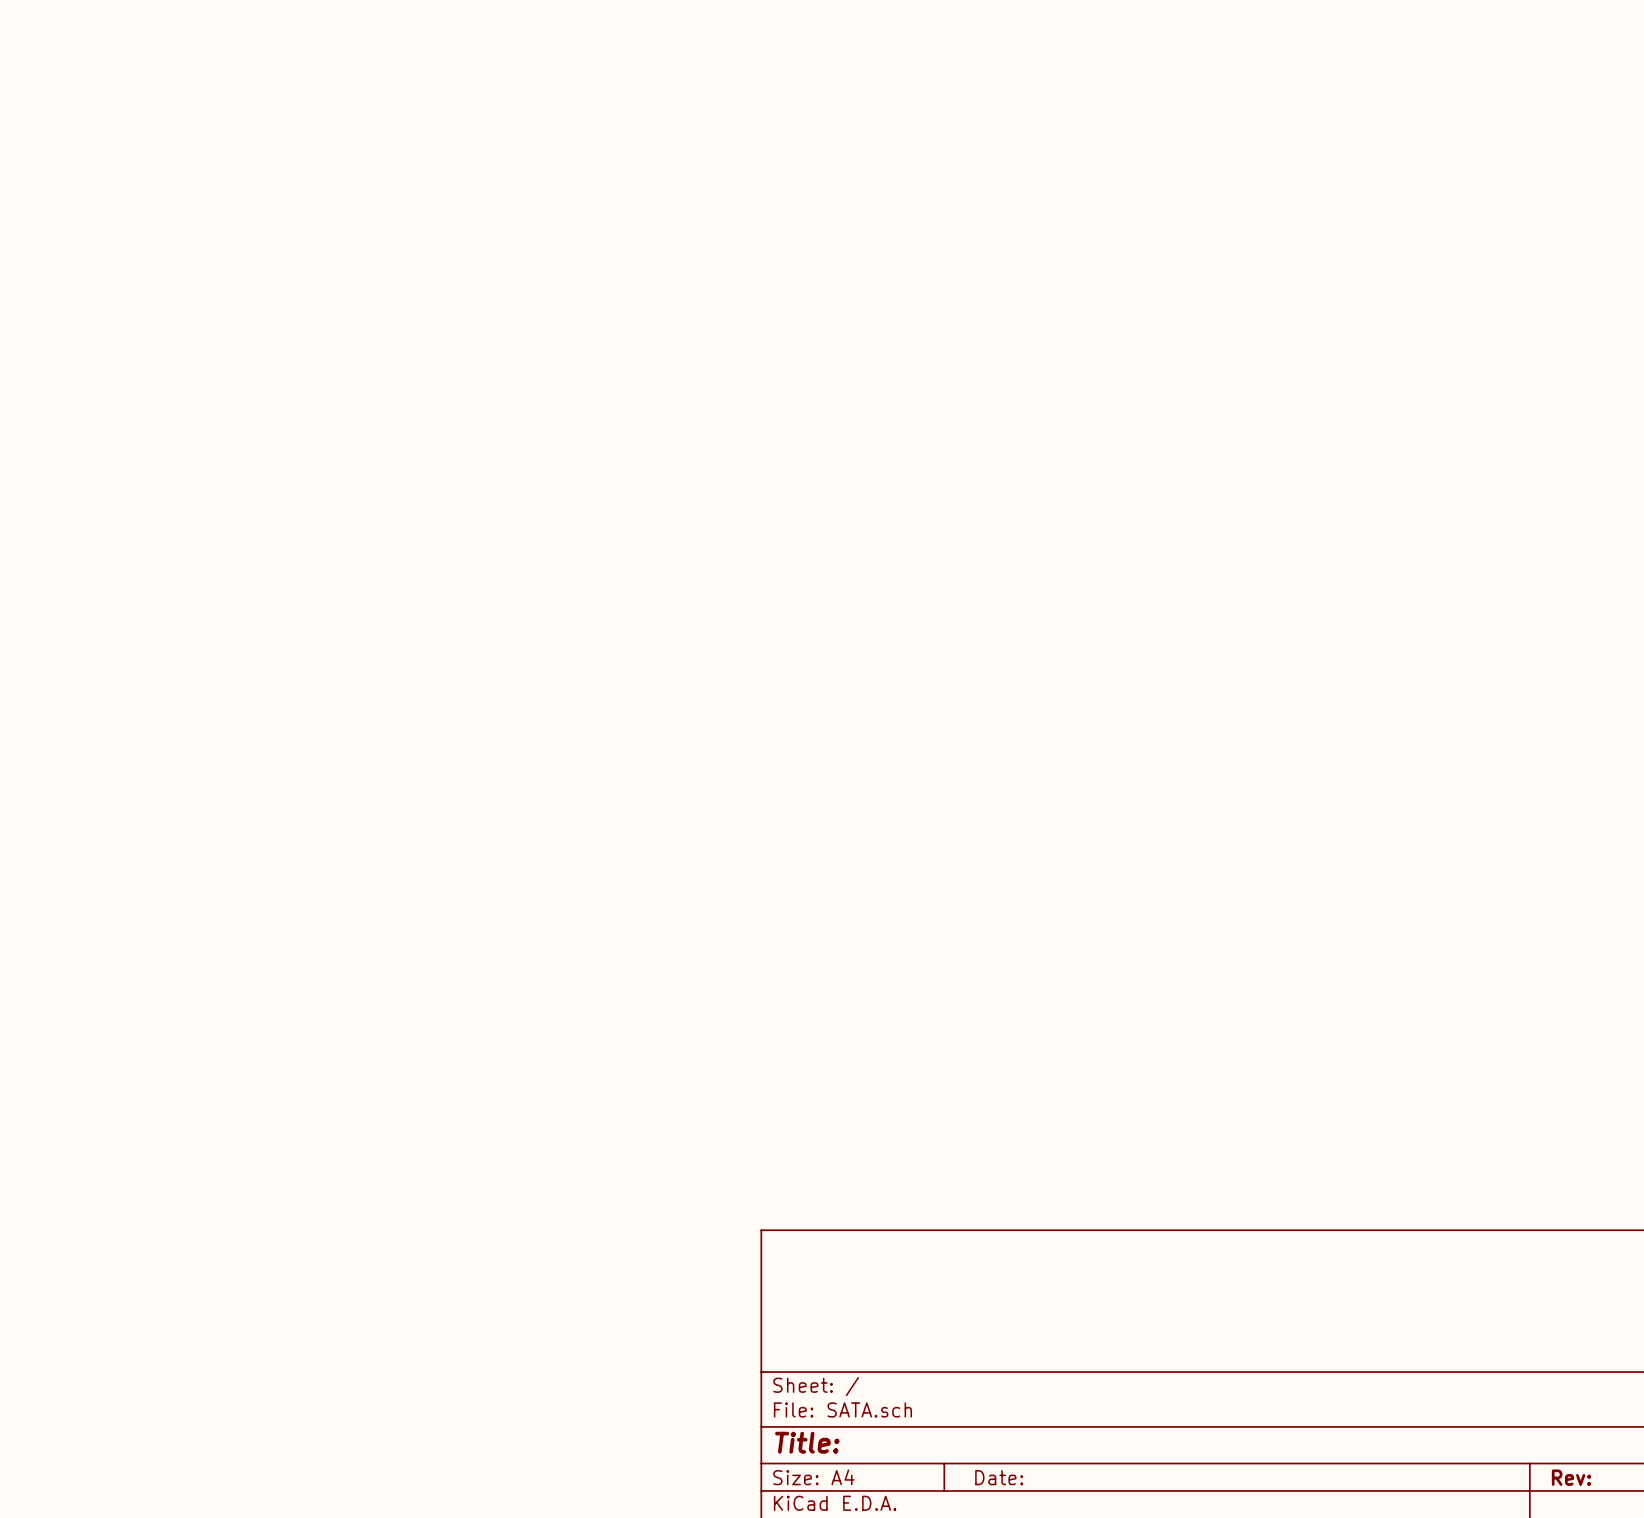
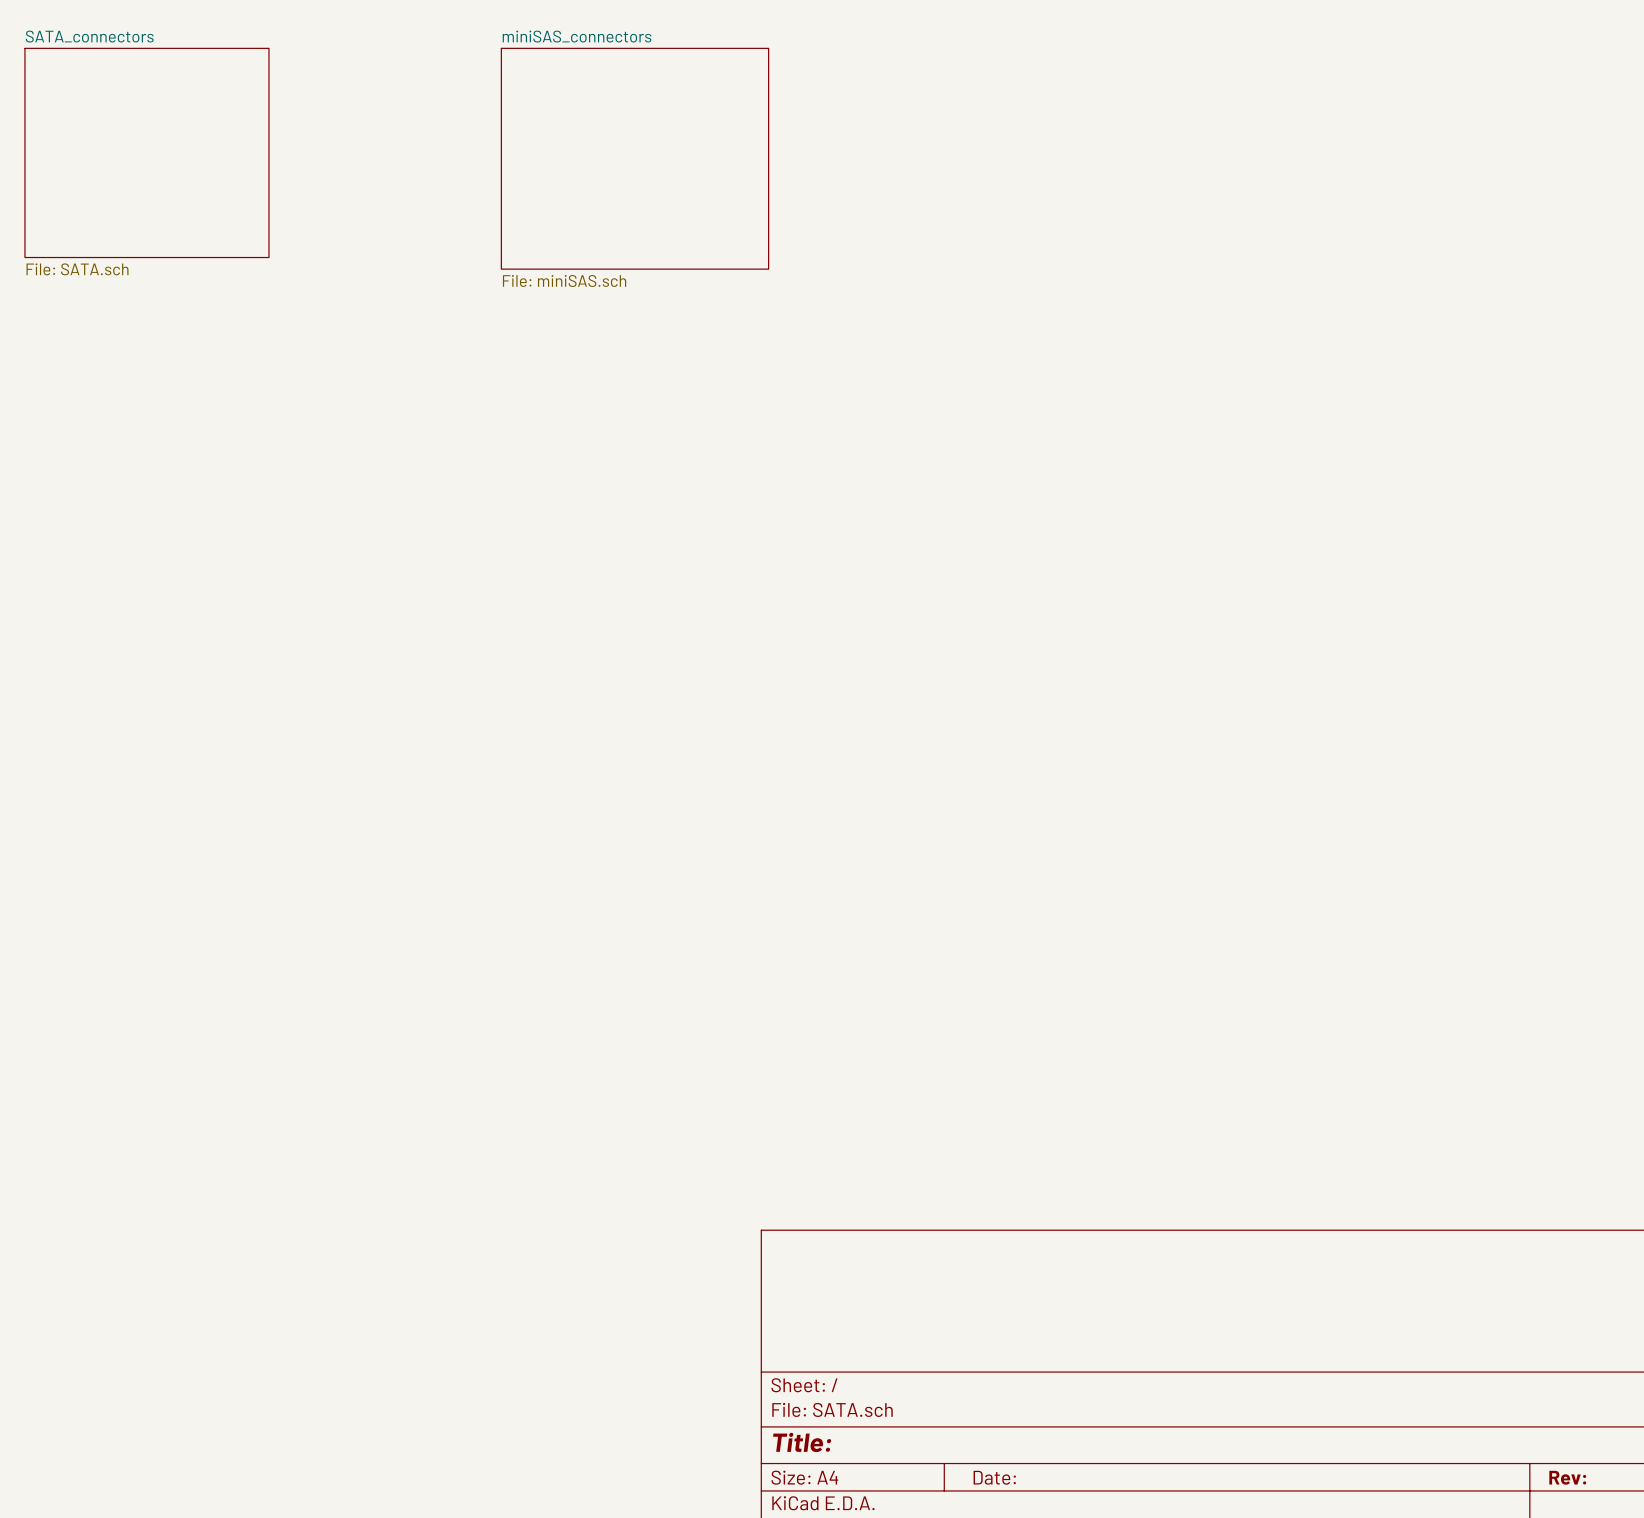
sheet SATA_connectors: none -> File: SATA.sch (146, 152)
sheet miniSAS_connectors: none -> File: miniSAS.sch (634, 158)

